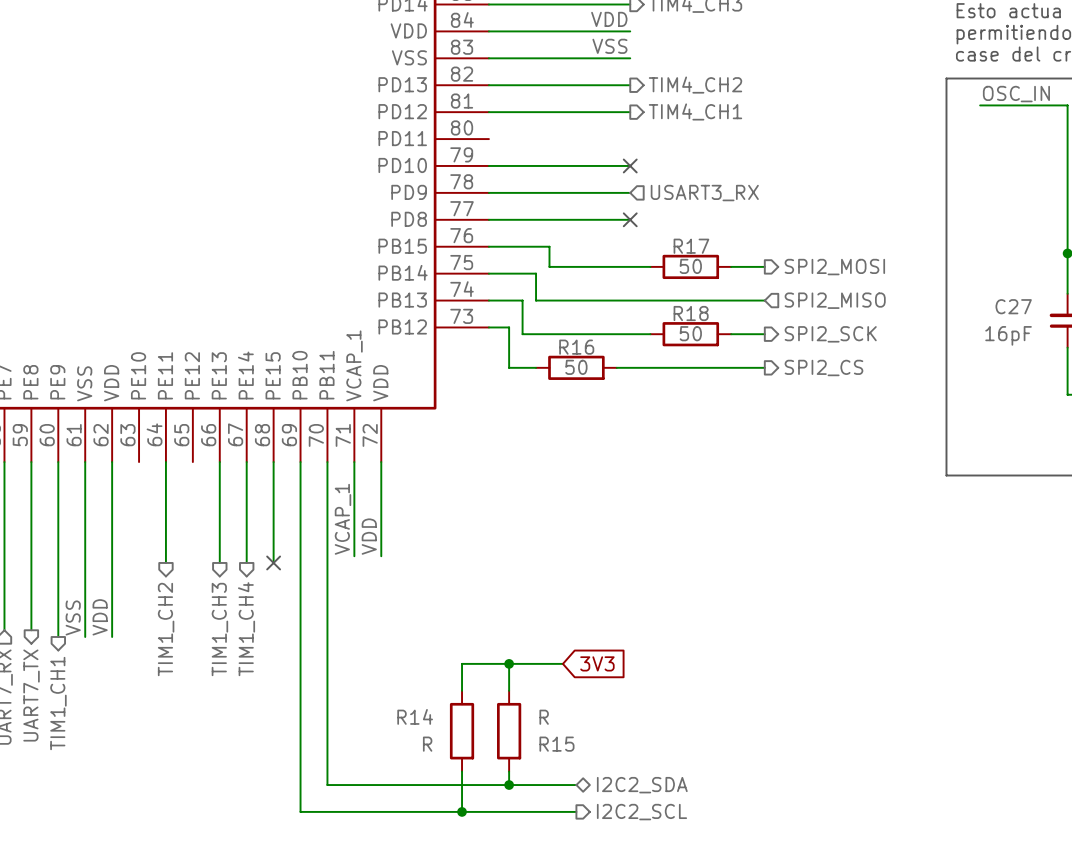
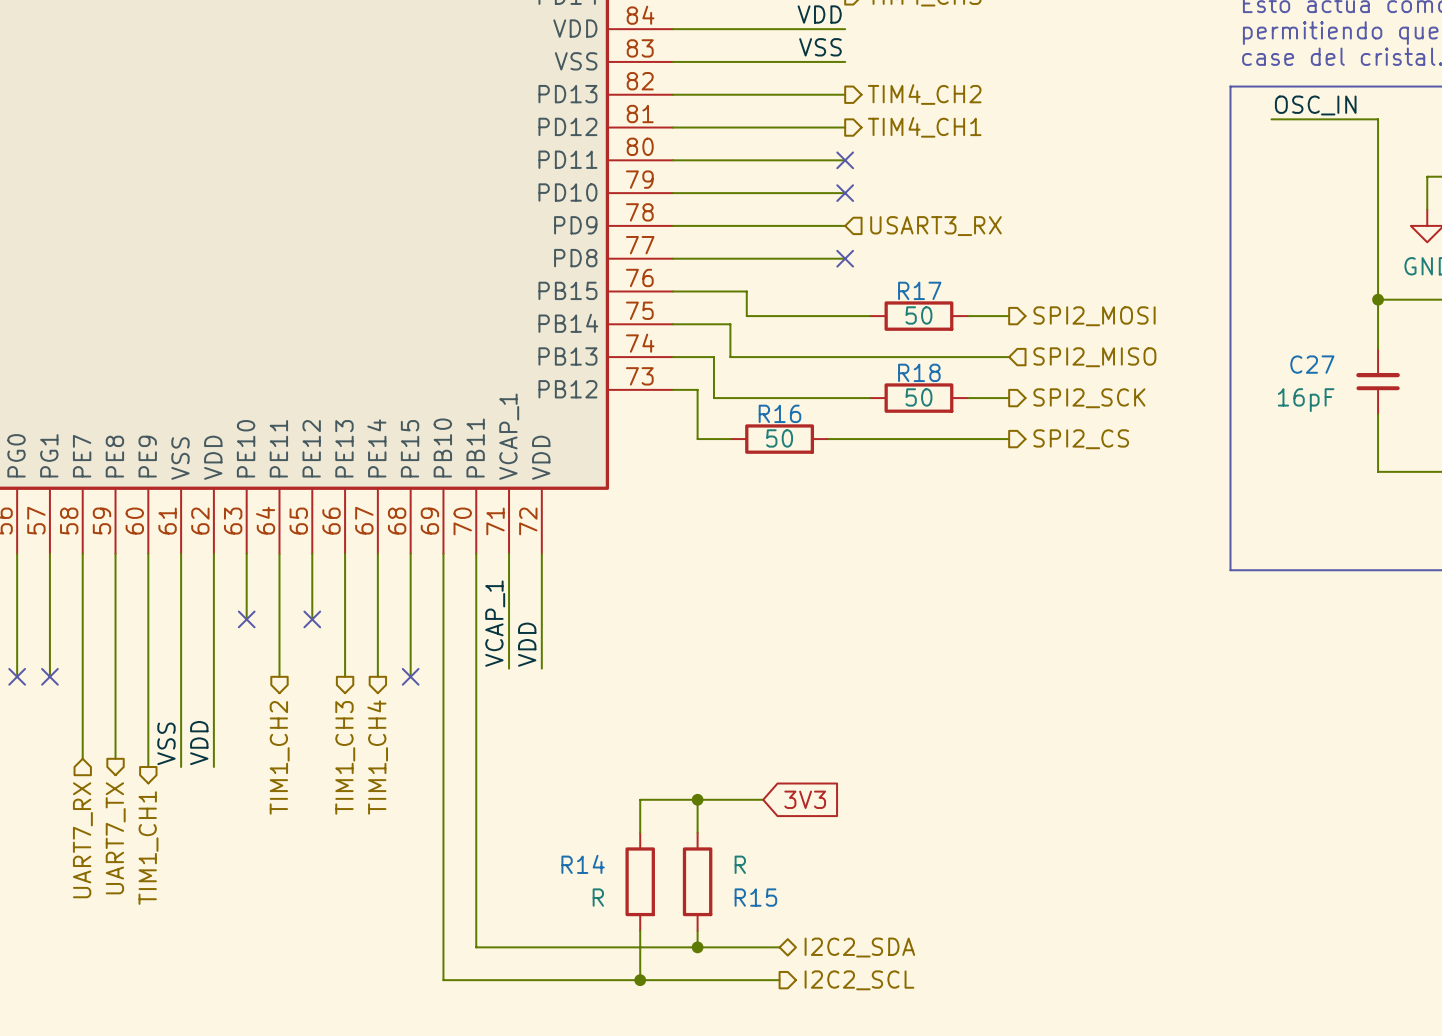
wire: none -> (673, 160) (845, 160)
no-connect mark: none -> (845, 160)
wire: none -> (246, 553) (246, 619)
wire: none -> (312, 553) (312, 619)
no-connect mark: none -> (246, 619)
no-connect mark: none -> (312, 619)

